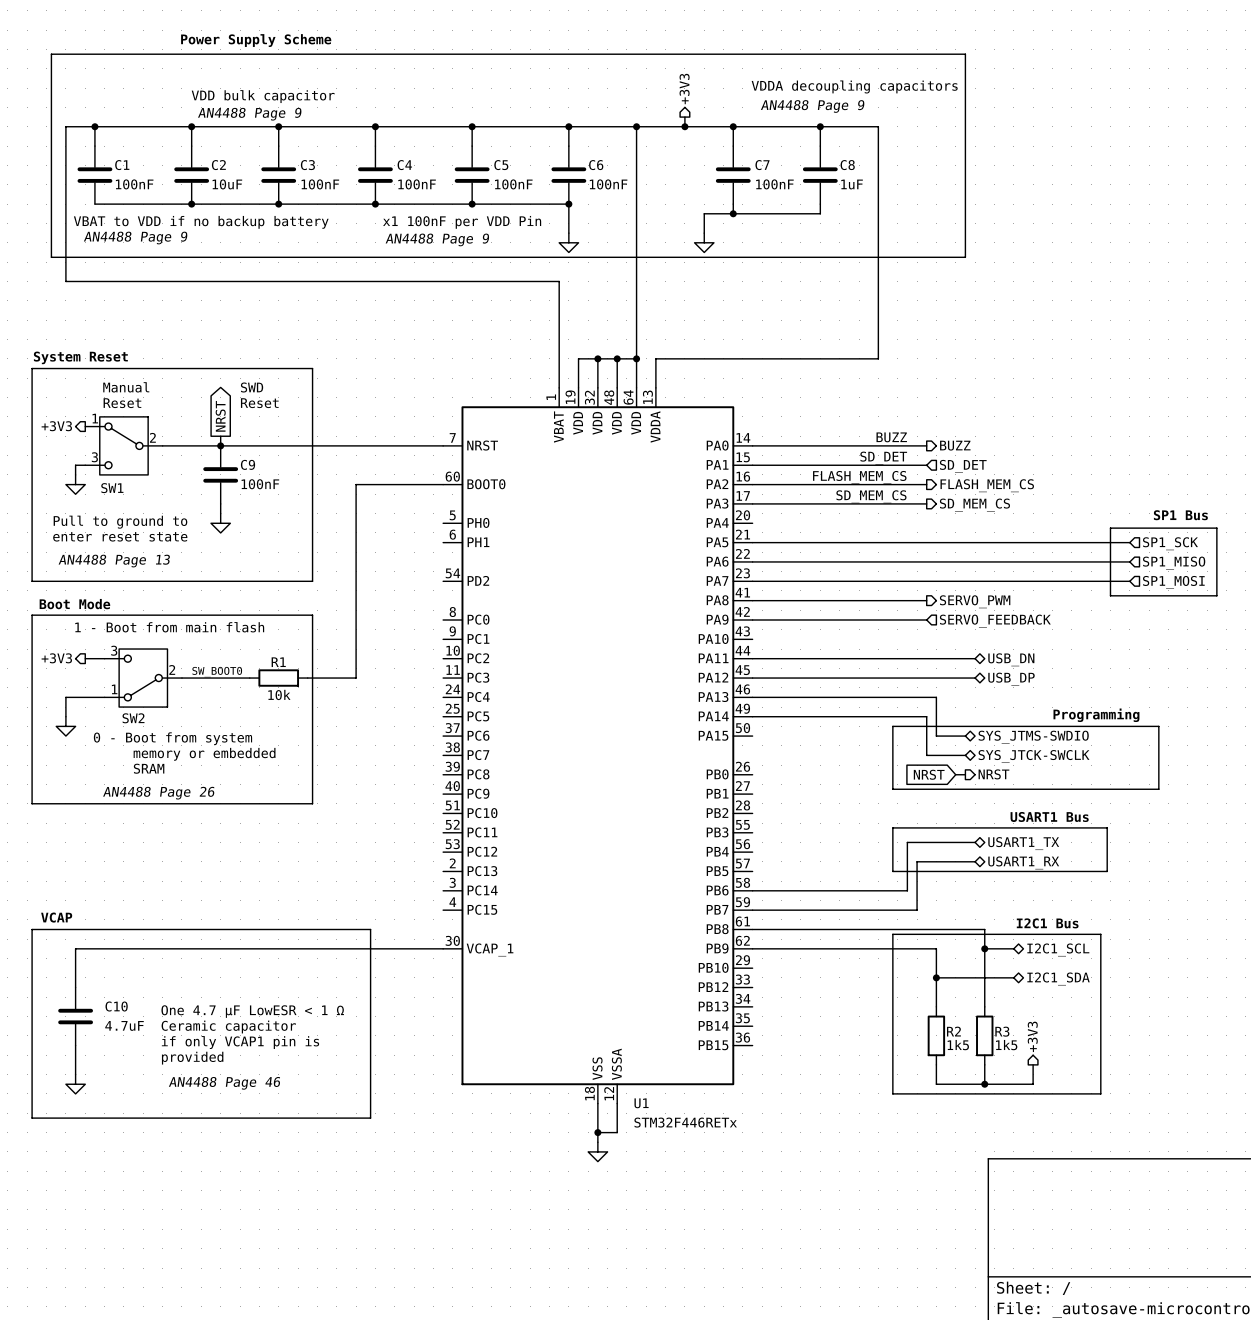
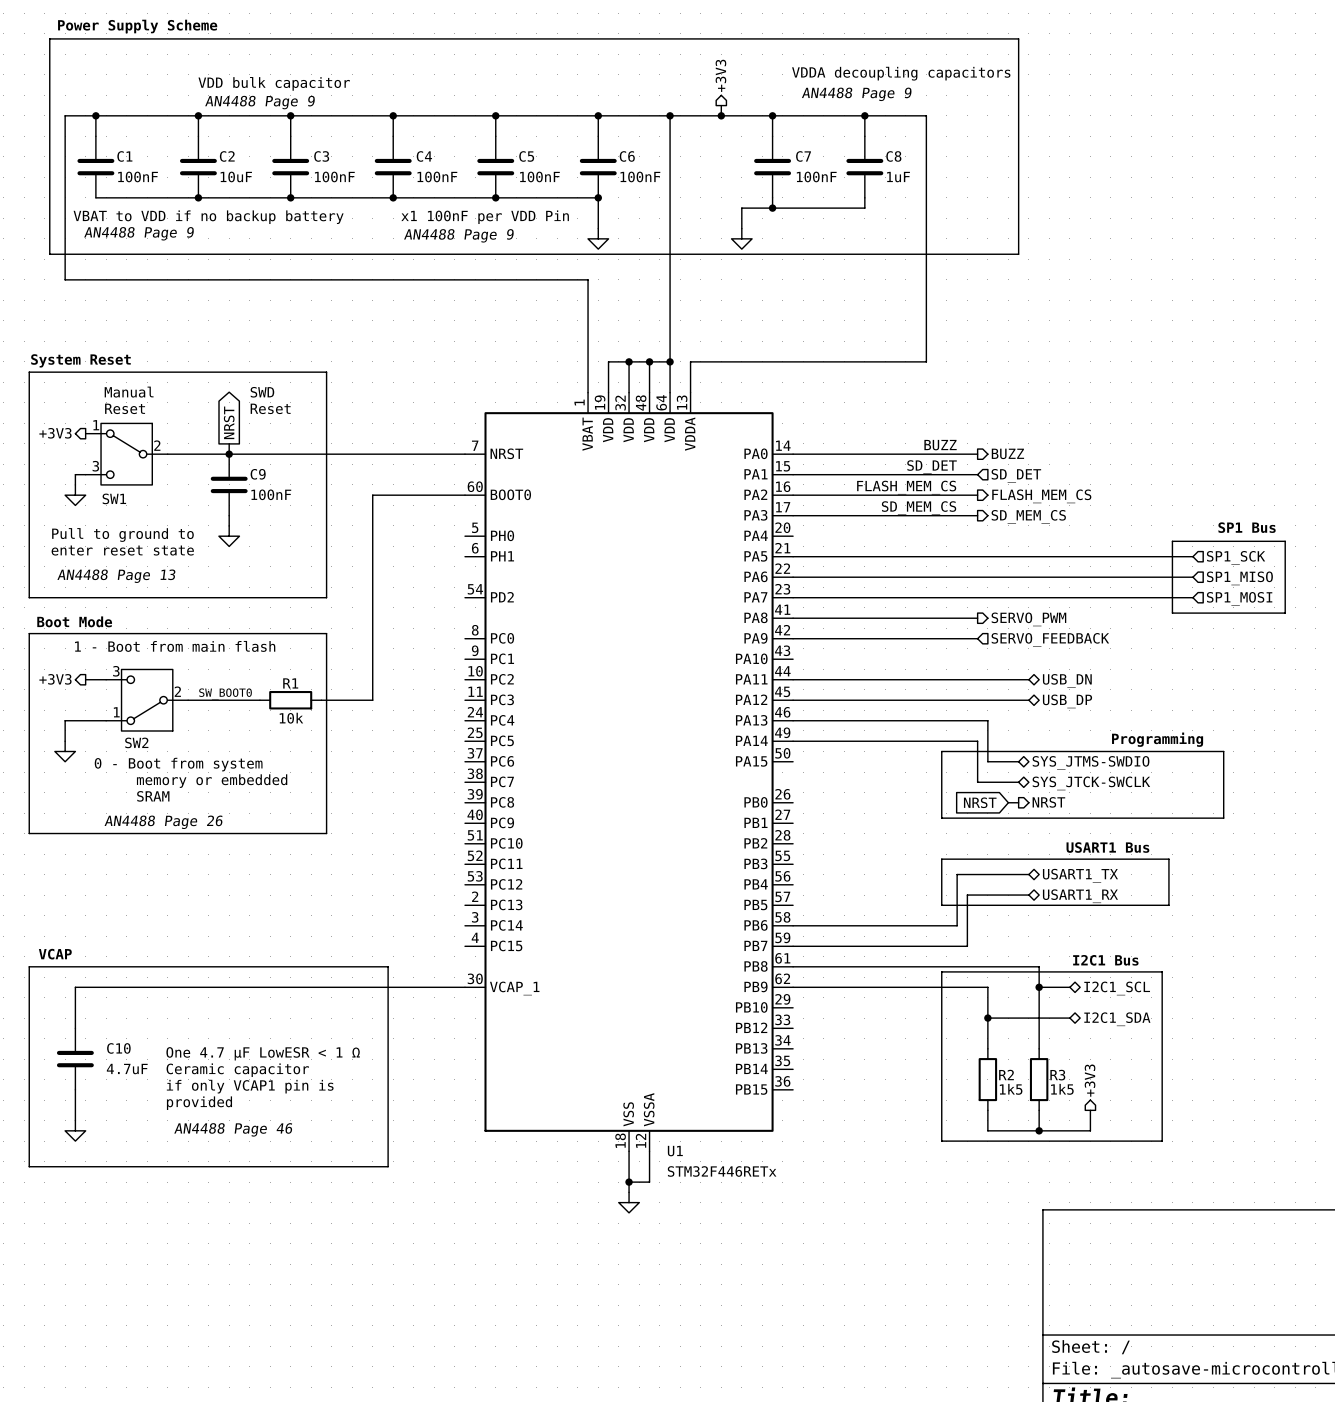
text position: Power Supply Scheme (256, 40) -> Power Supply Scheme (137, 26)

